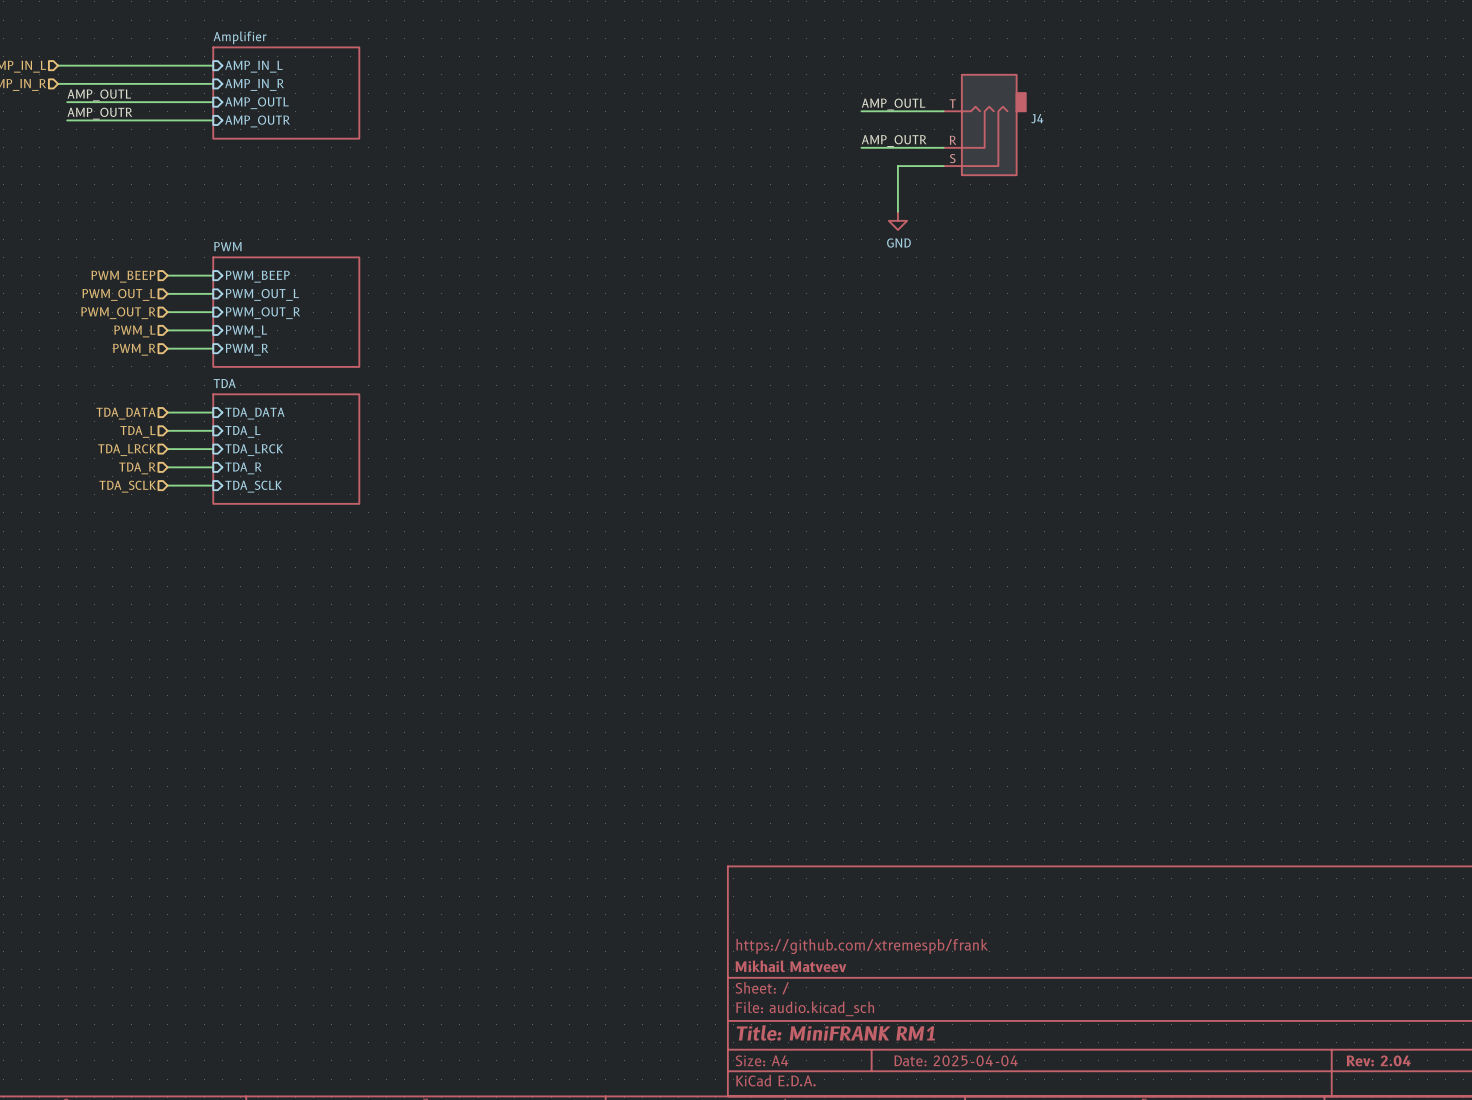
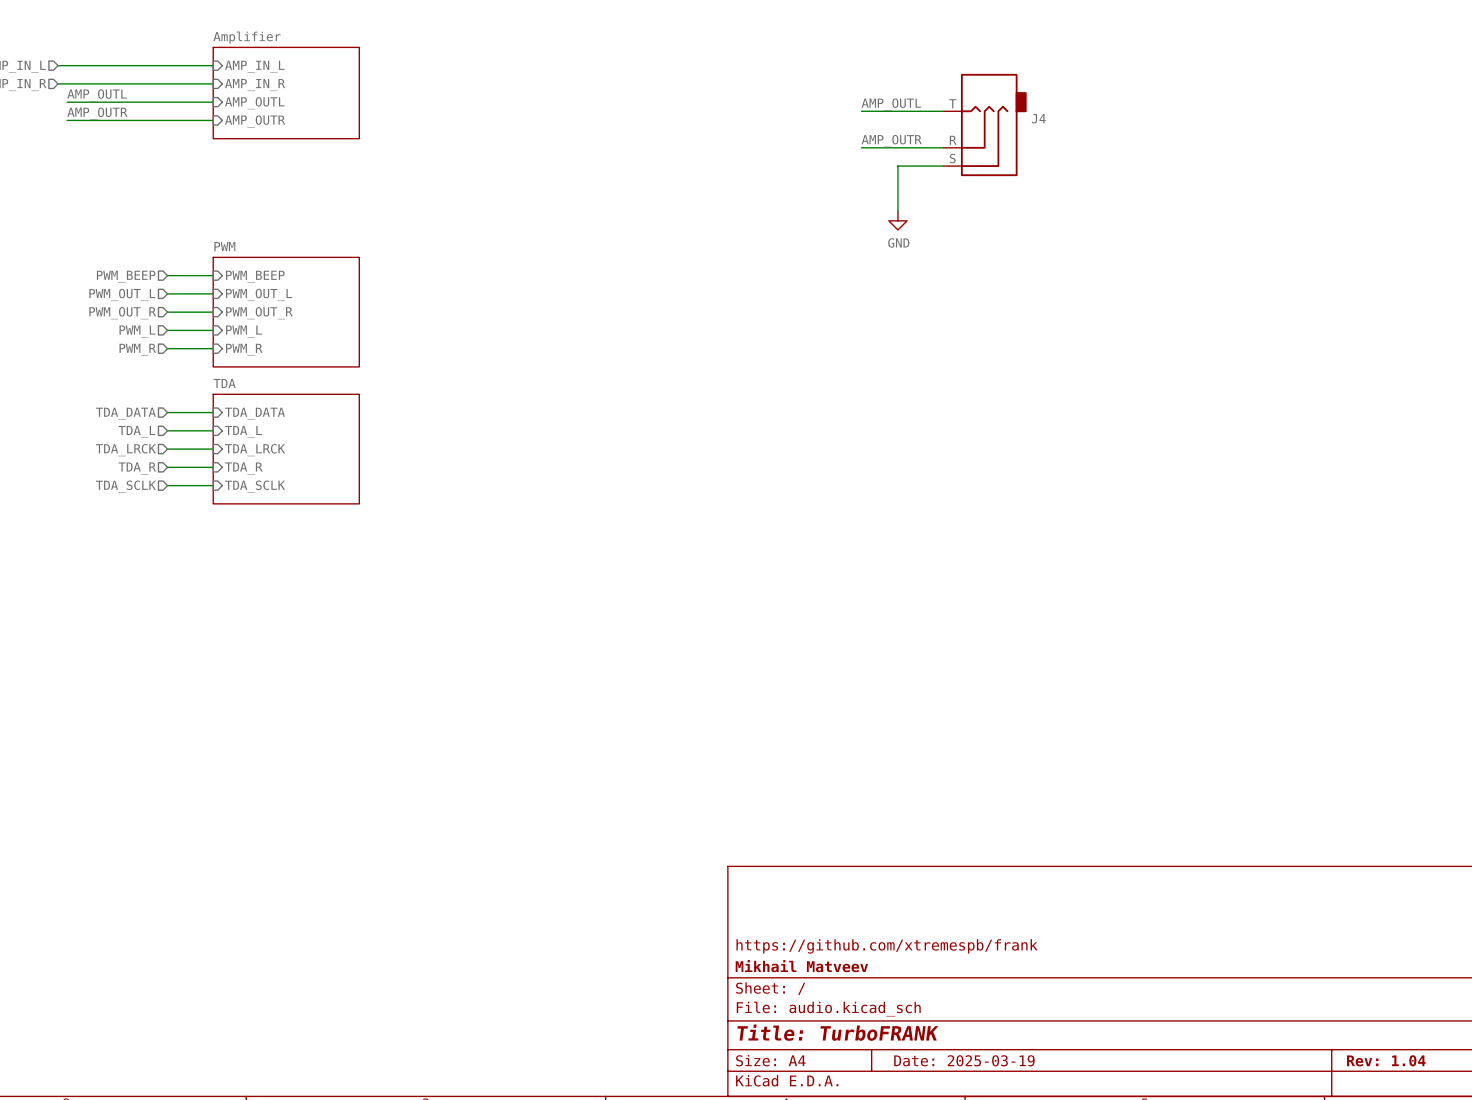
title block: Title: MiniFRANK RM1 (835, 1032) -> Title: TurboFRANK (837, 1032)
title block: Date: 2025-04-04 (956, 1060) -> Date: 2025-03-19 (964, 1060)
title block: Rev: 2.04 (1378, 1060) -> Rev: 1.04 (1386, 1060)

